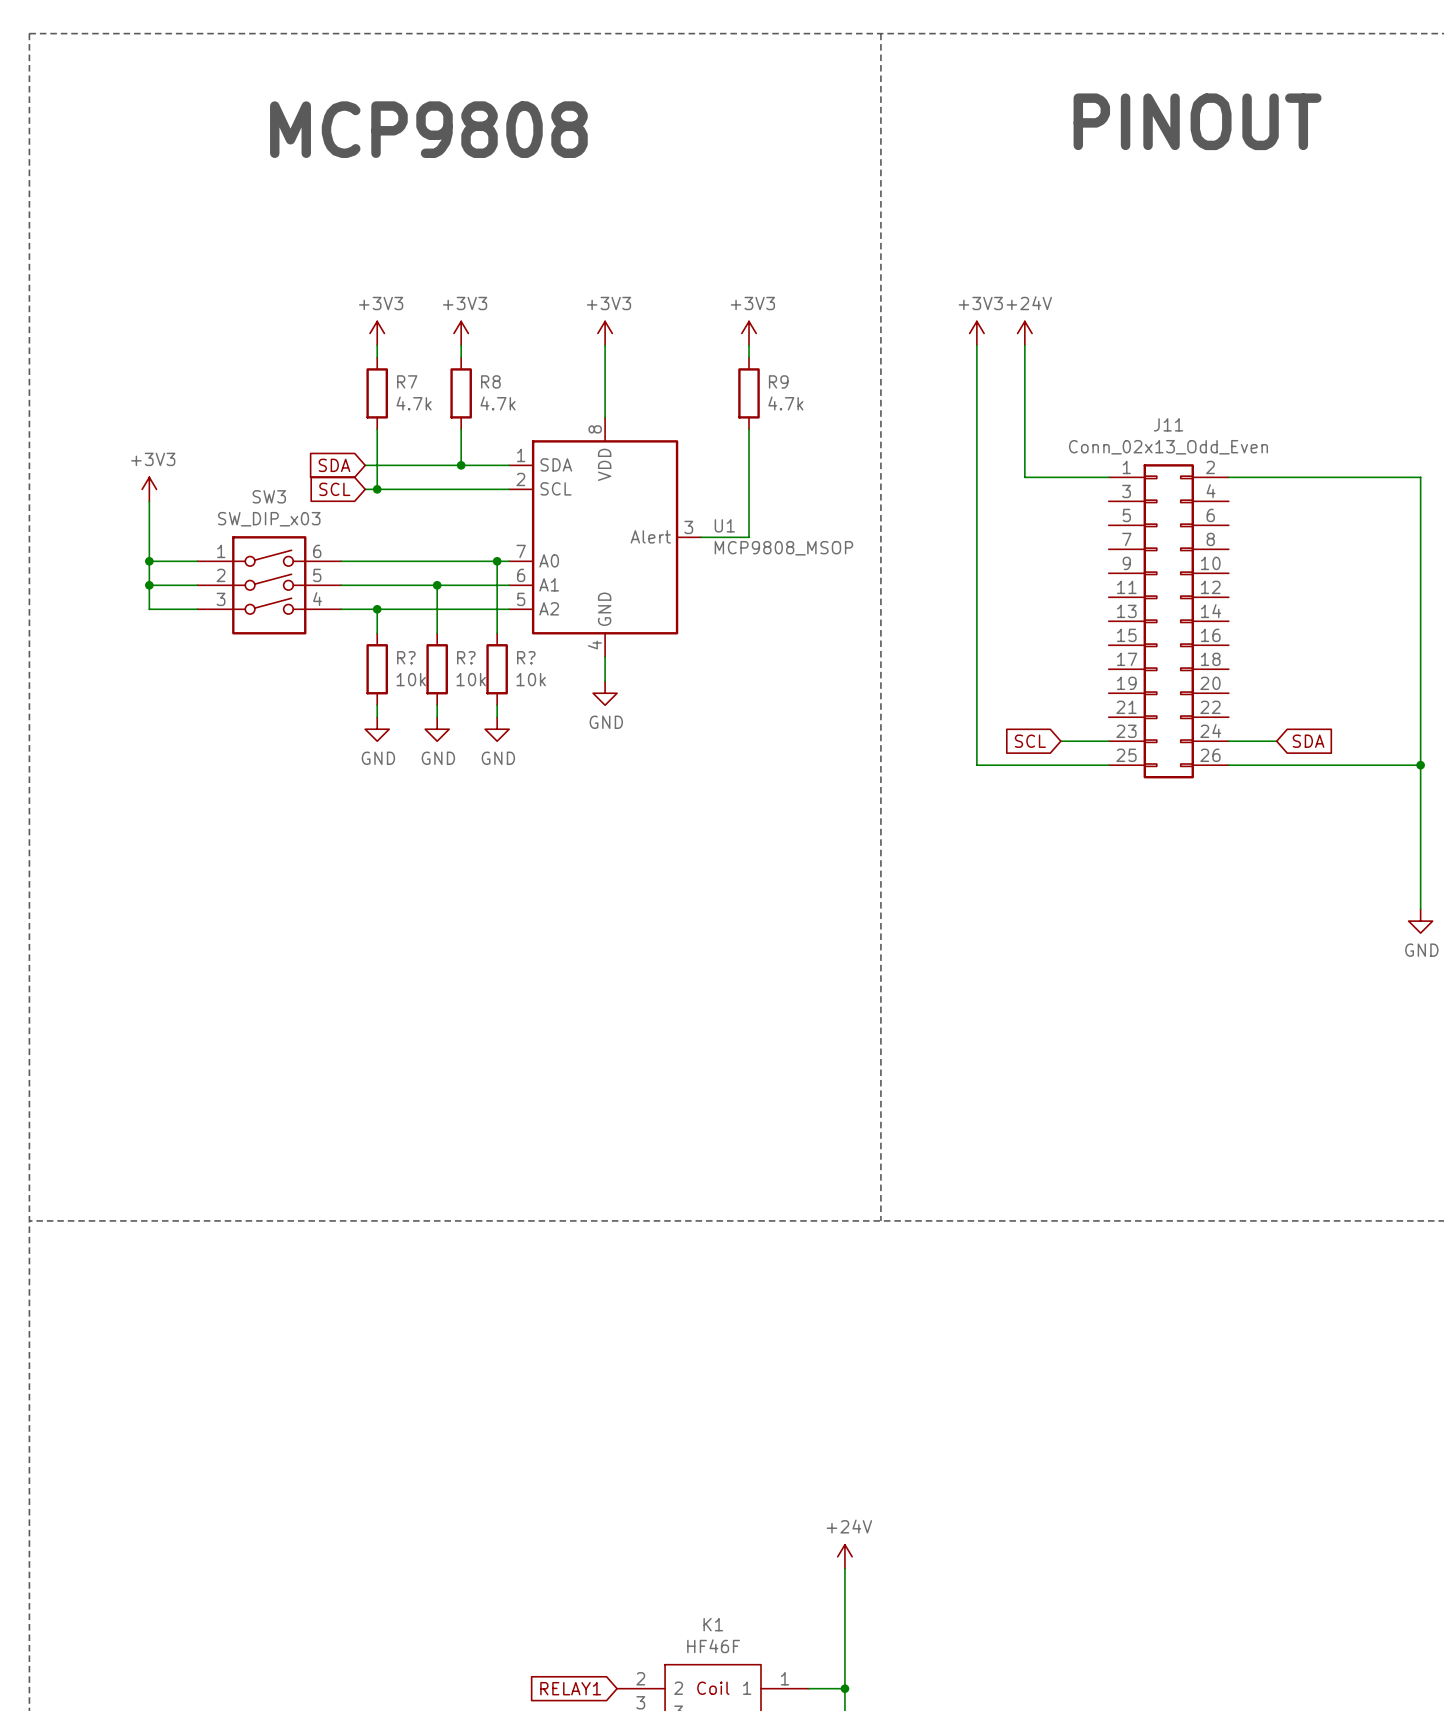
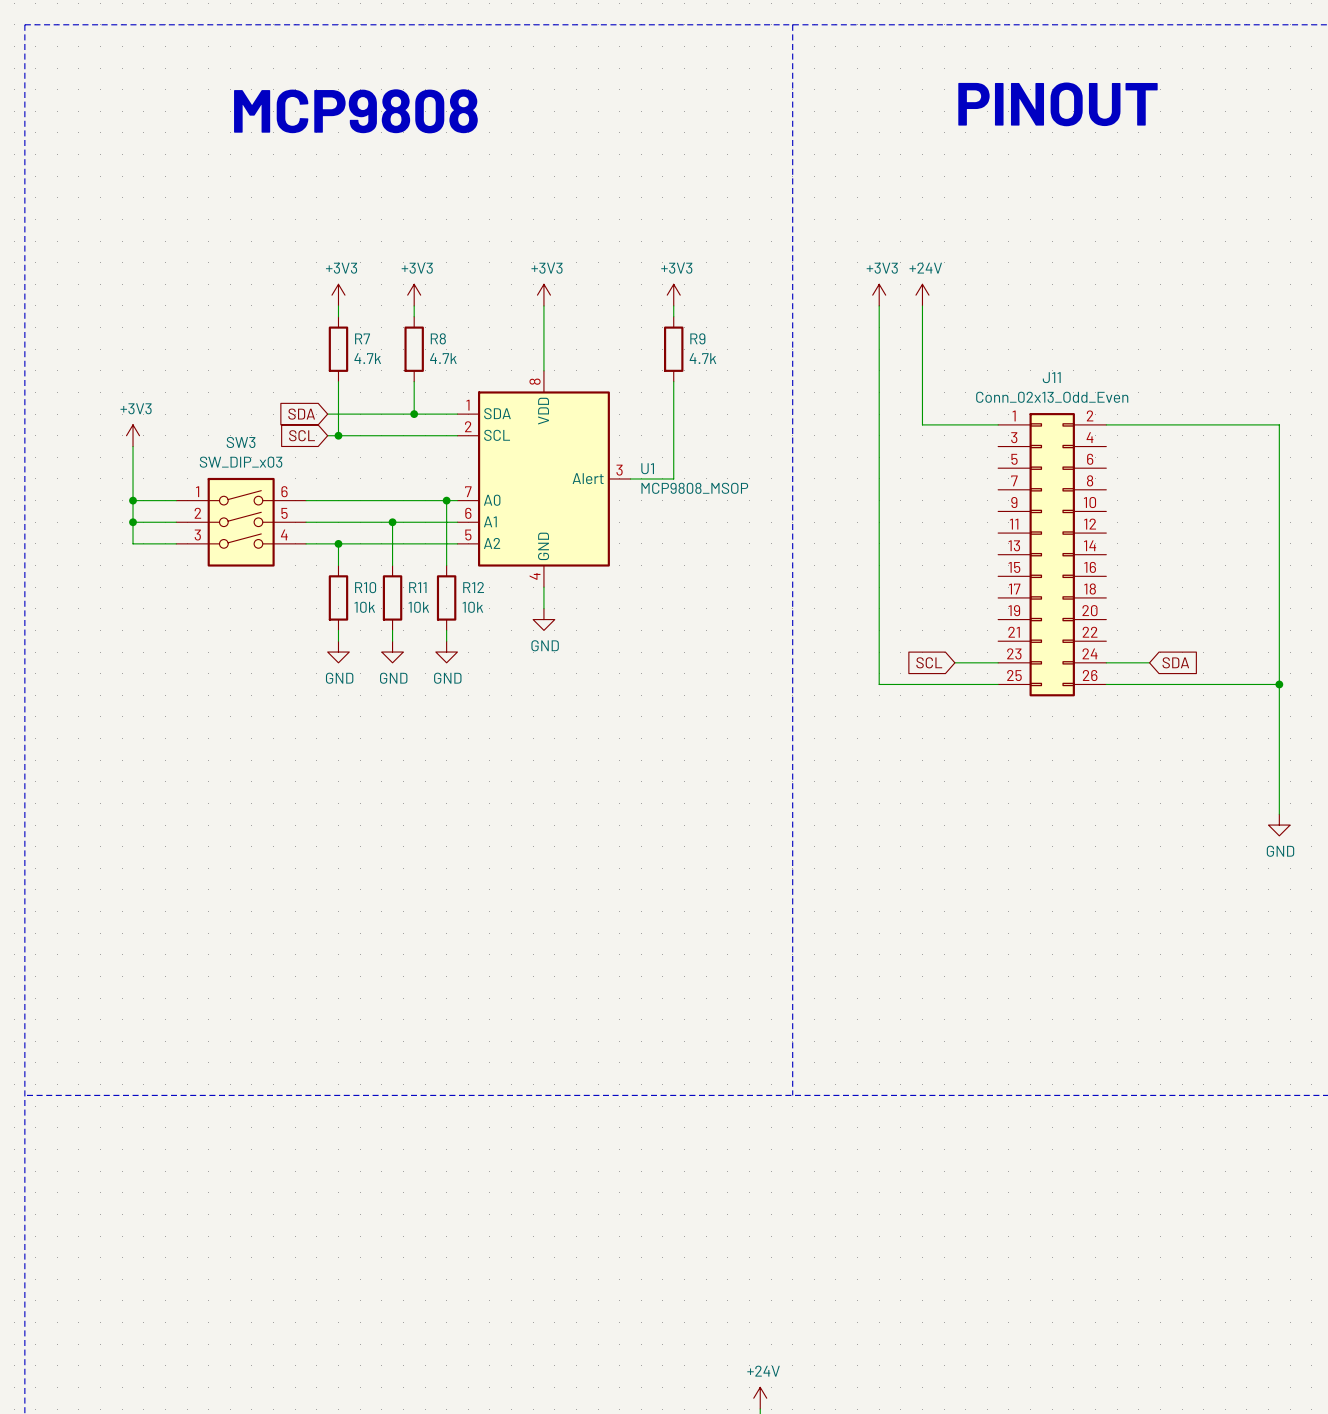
R? name: R? (406, 657) -> R10 (365, 587)
R? name: R? (466, 657) -> R11 (417, 587)
R? name: R? (526, 657) -> R12 (473, 587)

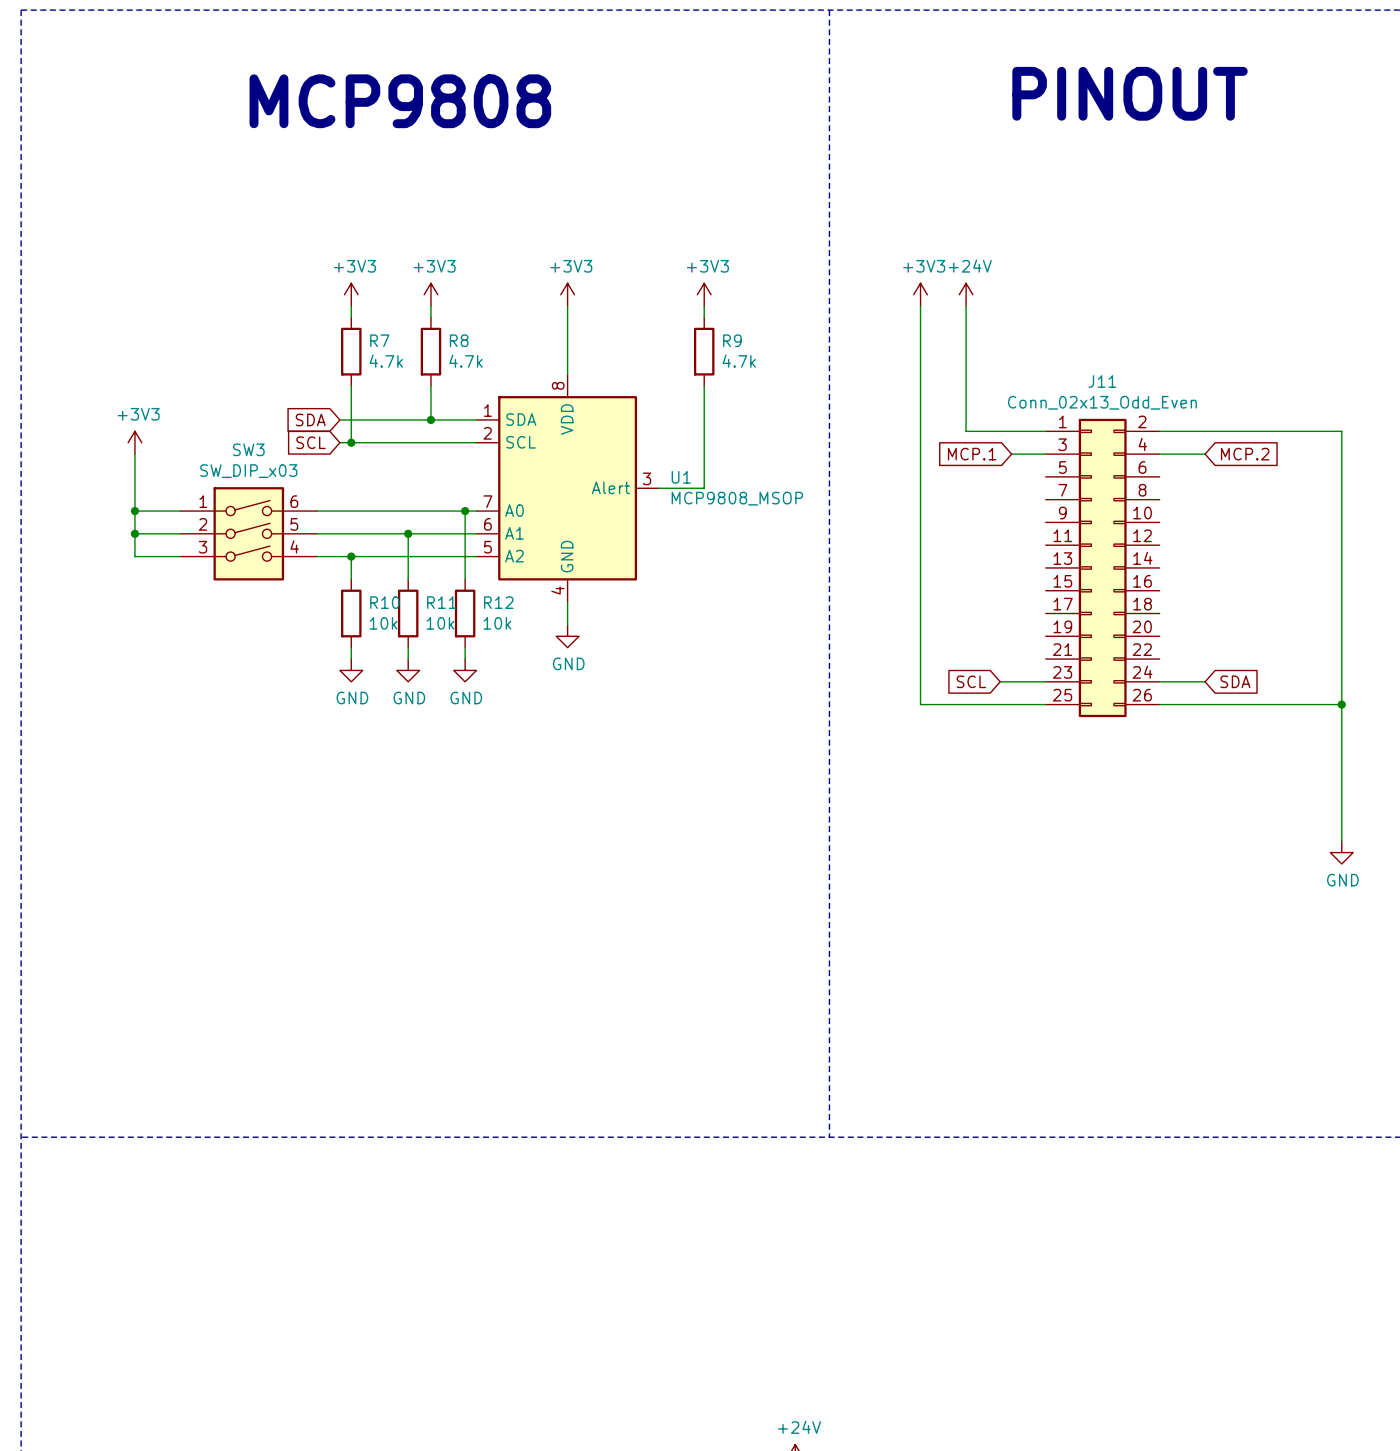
global label: none -> MCP.1 (972, 454)
wire: none -> (1011, 454) (1045, 454)
wire: none -> (1159, 454) (1205, 454)
global label: none -> MCP.2 (1245, 454)

